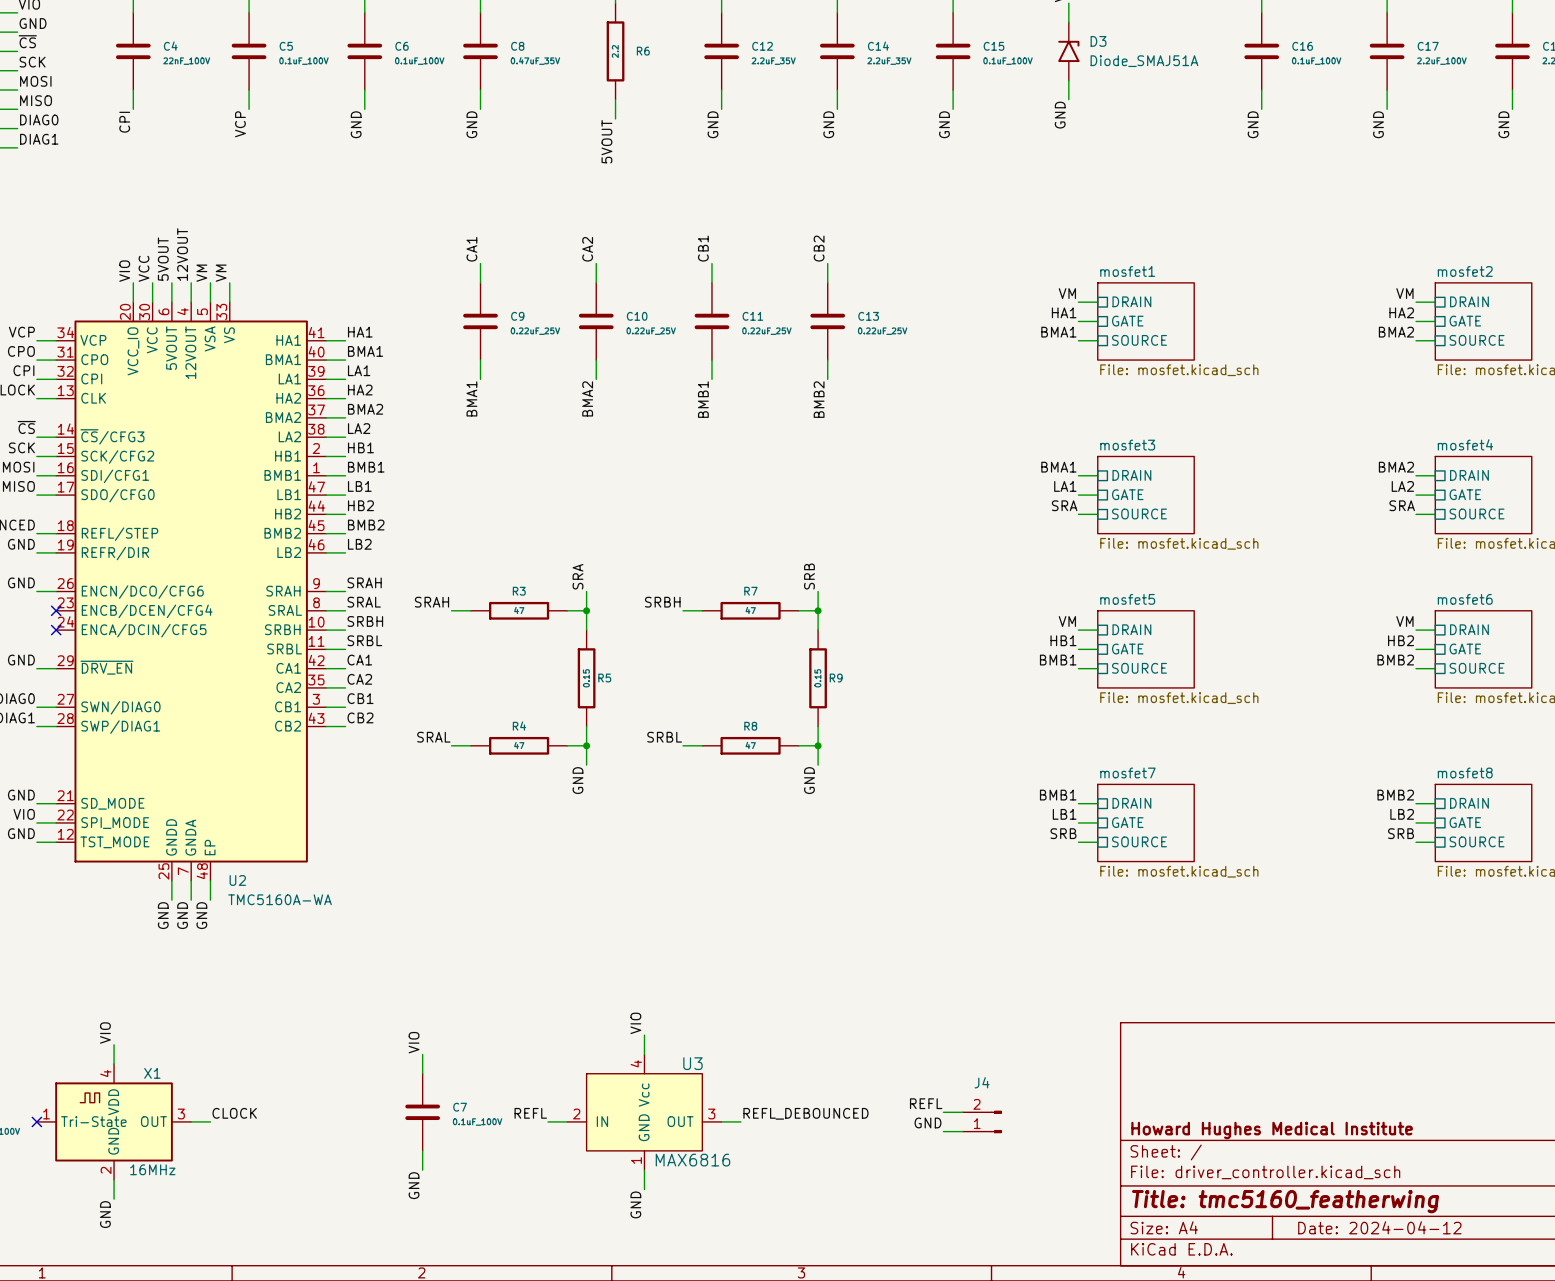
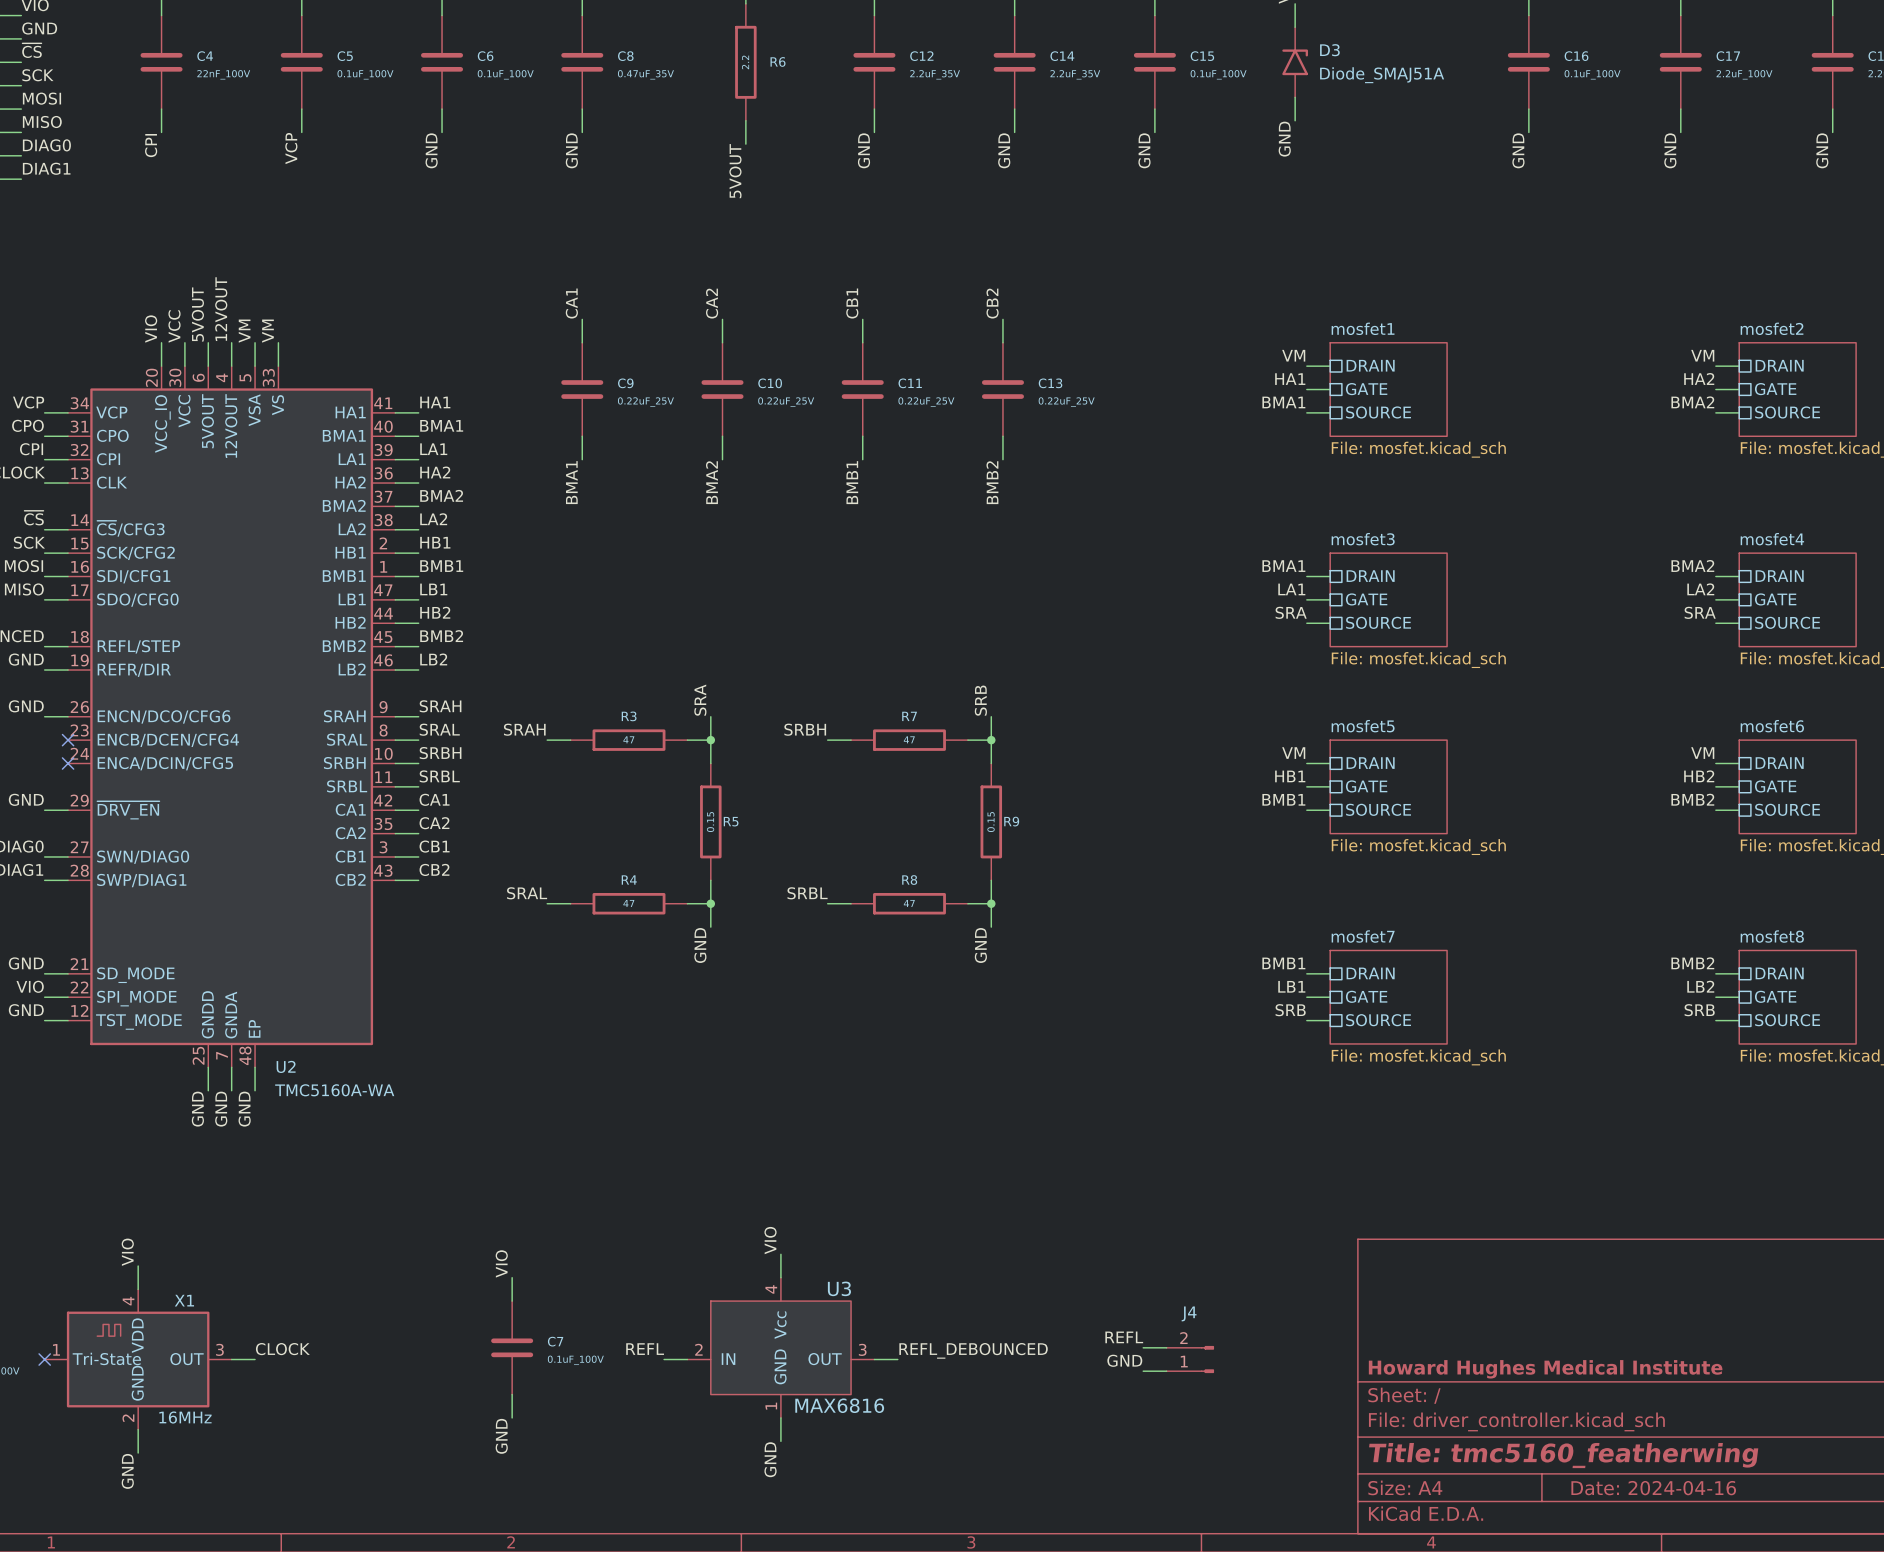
title block: Date: 2024-04-12 (1379, 1227) -> Date: 2024-04-16 (1653, 1488)

